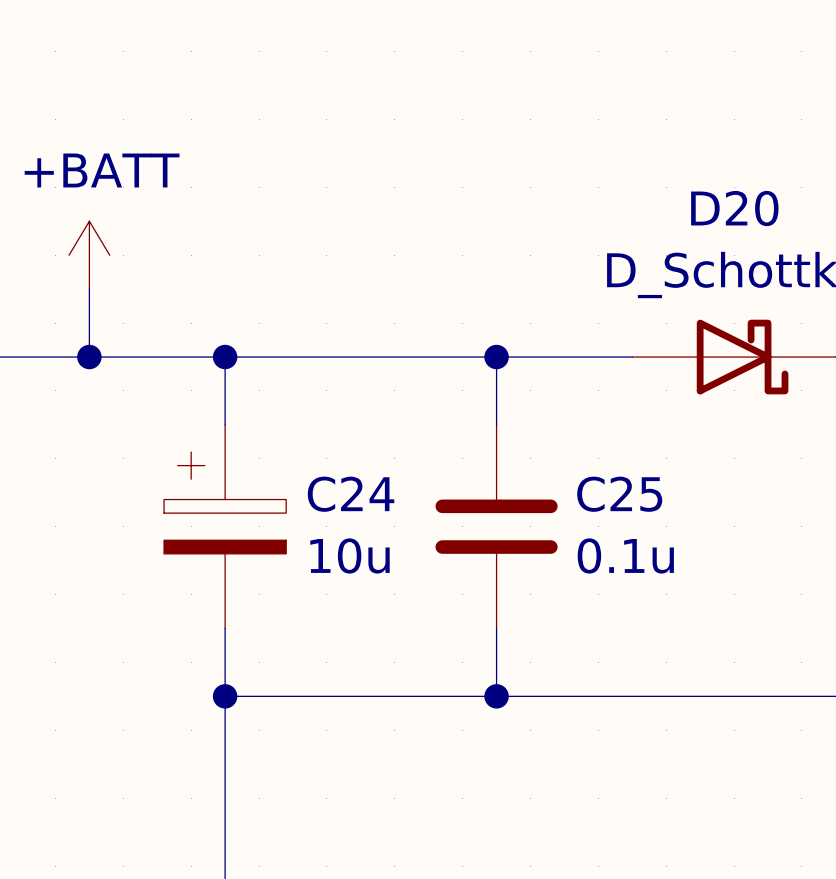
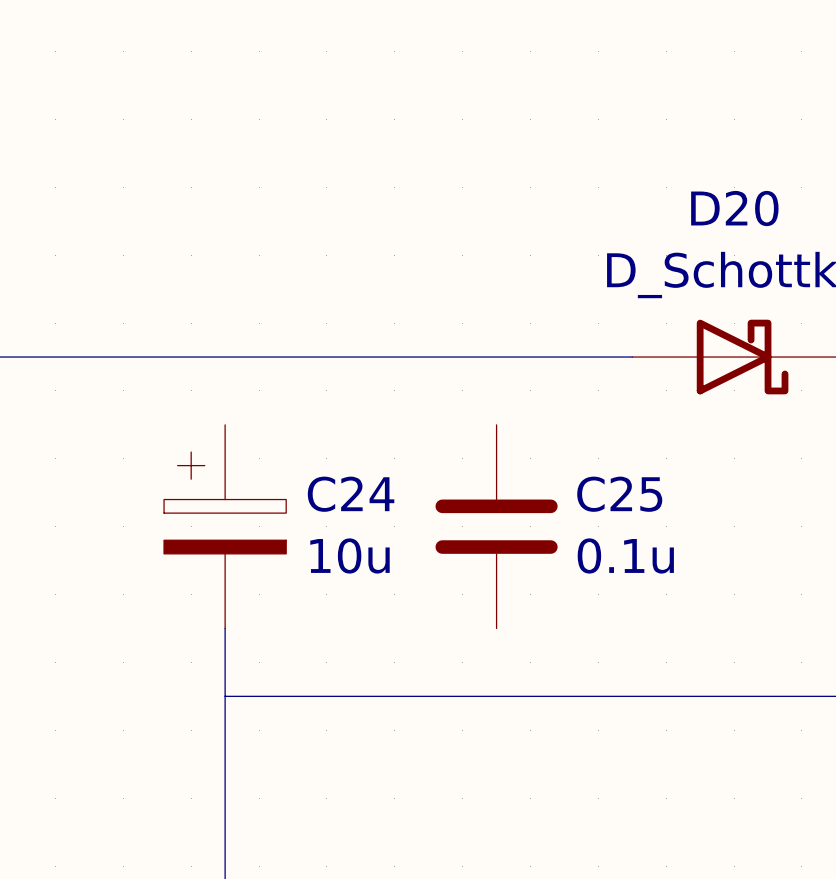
power symbol: +BATT (89, 255) -> none
wire: (89, 289) (89, 357) -> none
junction: (89, 357) -> none
wire: (225, 357) (225, 424) -> none
junction: (225, 357) -> none
wire: (496, 357) (496, 424) -> none
junction: (496, 357) -> none
wire: (496, 628) (496, 696) -> none
junction: (225, 696) -> none
junction: (496, 696) -> none

